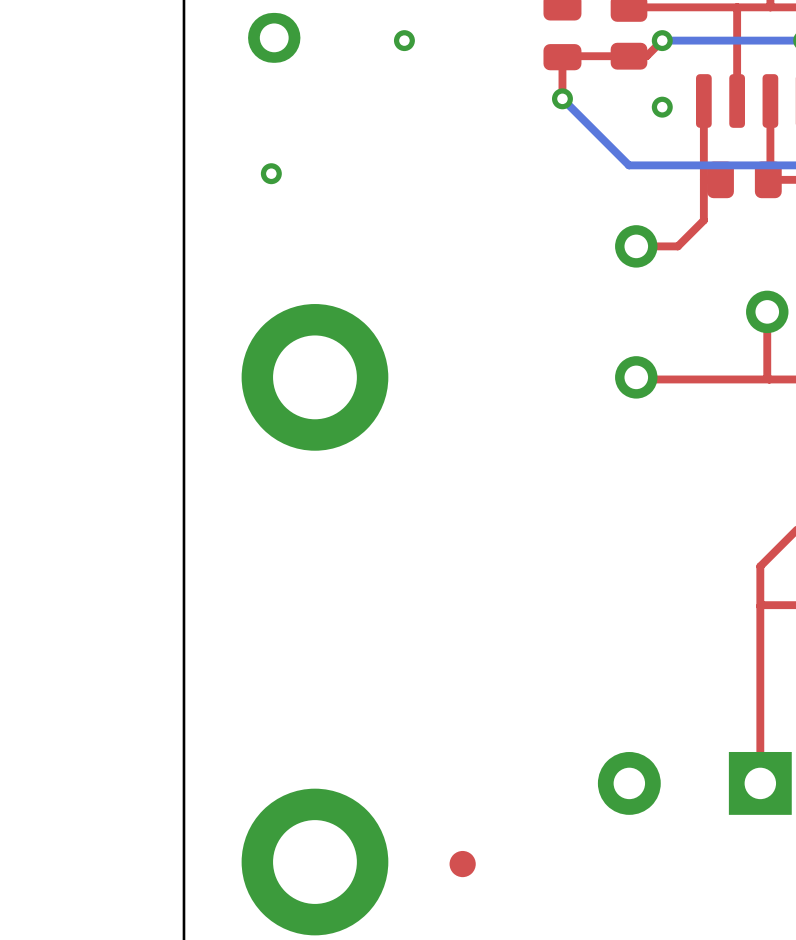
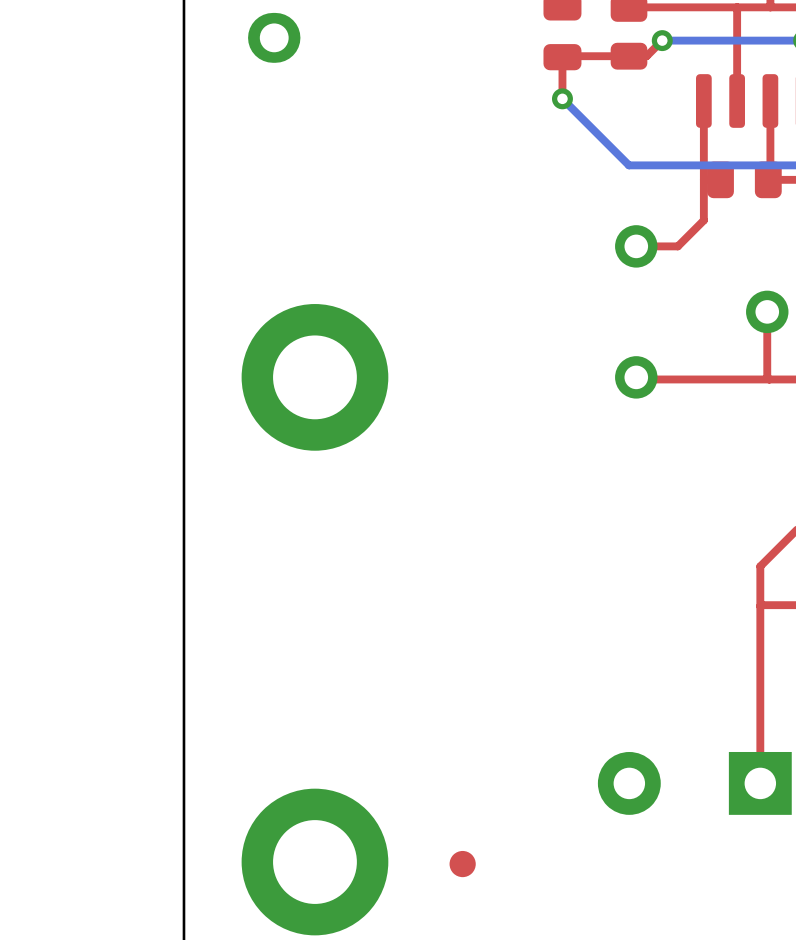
via: (404, 40) -> none
via: (662, 107) -> none
via: (271, 173) -> none

